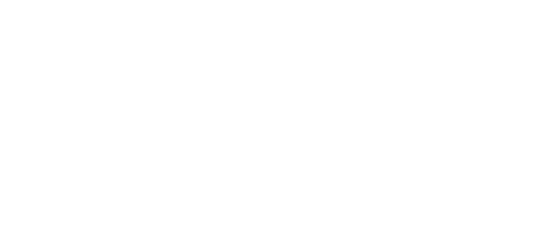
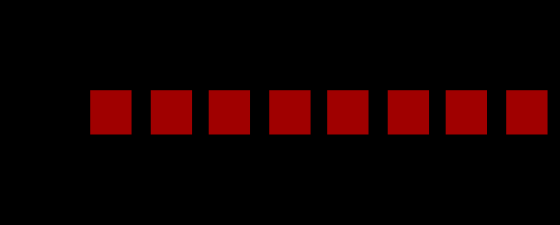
part: none -> (141, 112)
part: none -> (259, 112)
part: none -> (378, 112)
part: none -> (496, 112)

